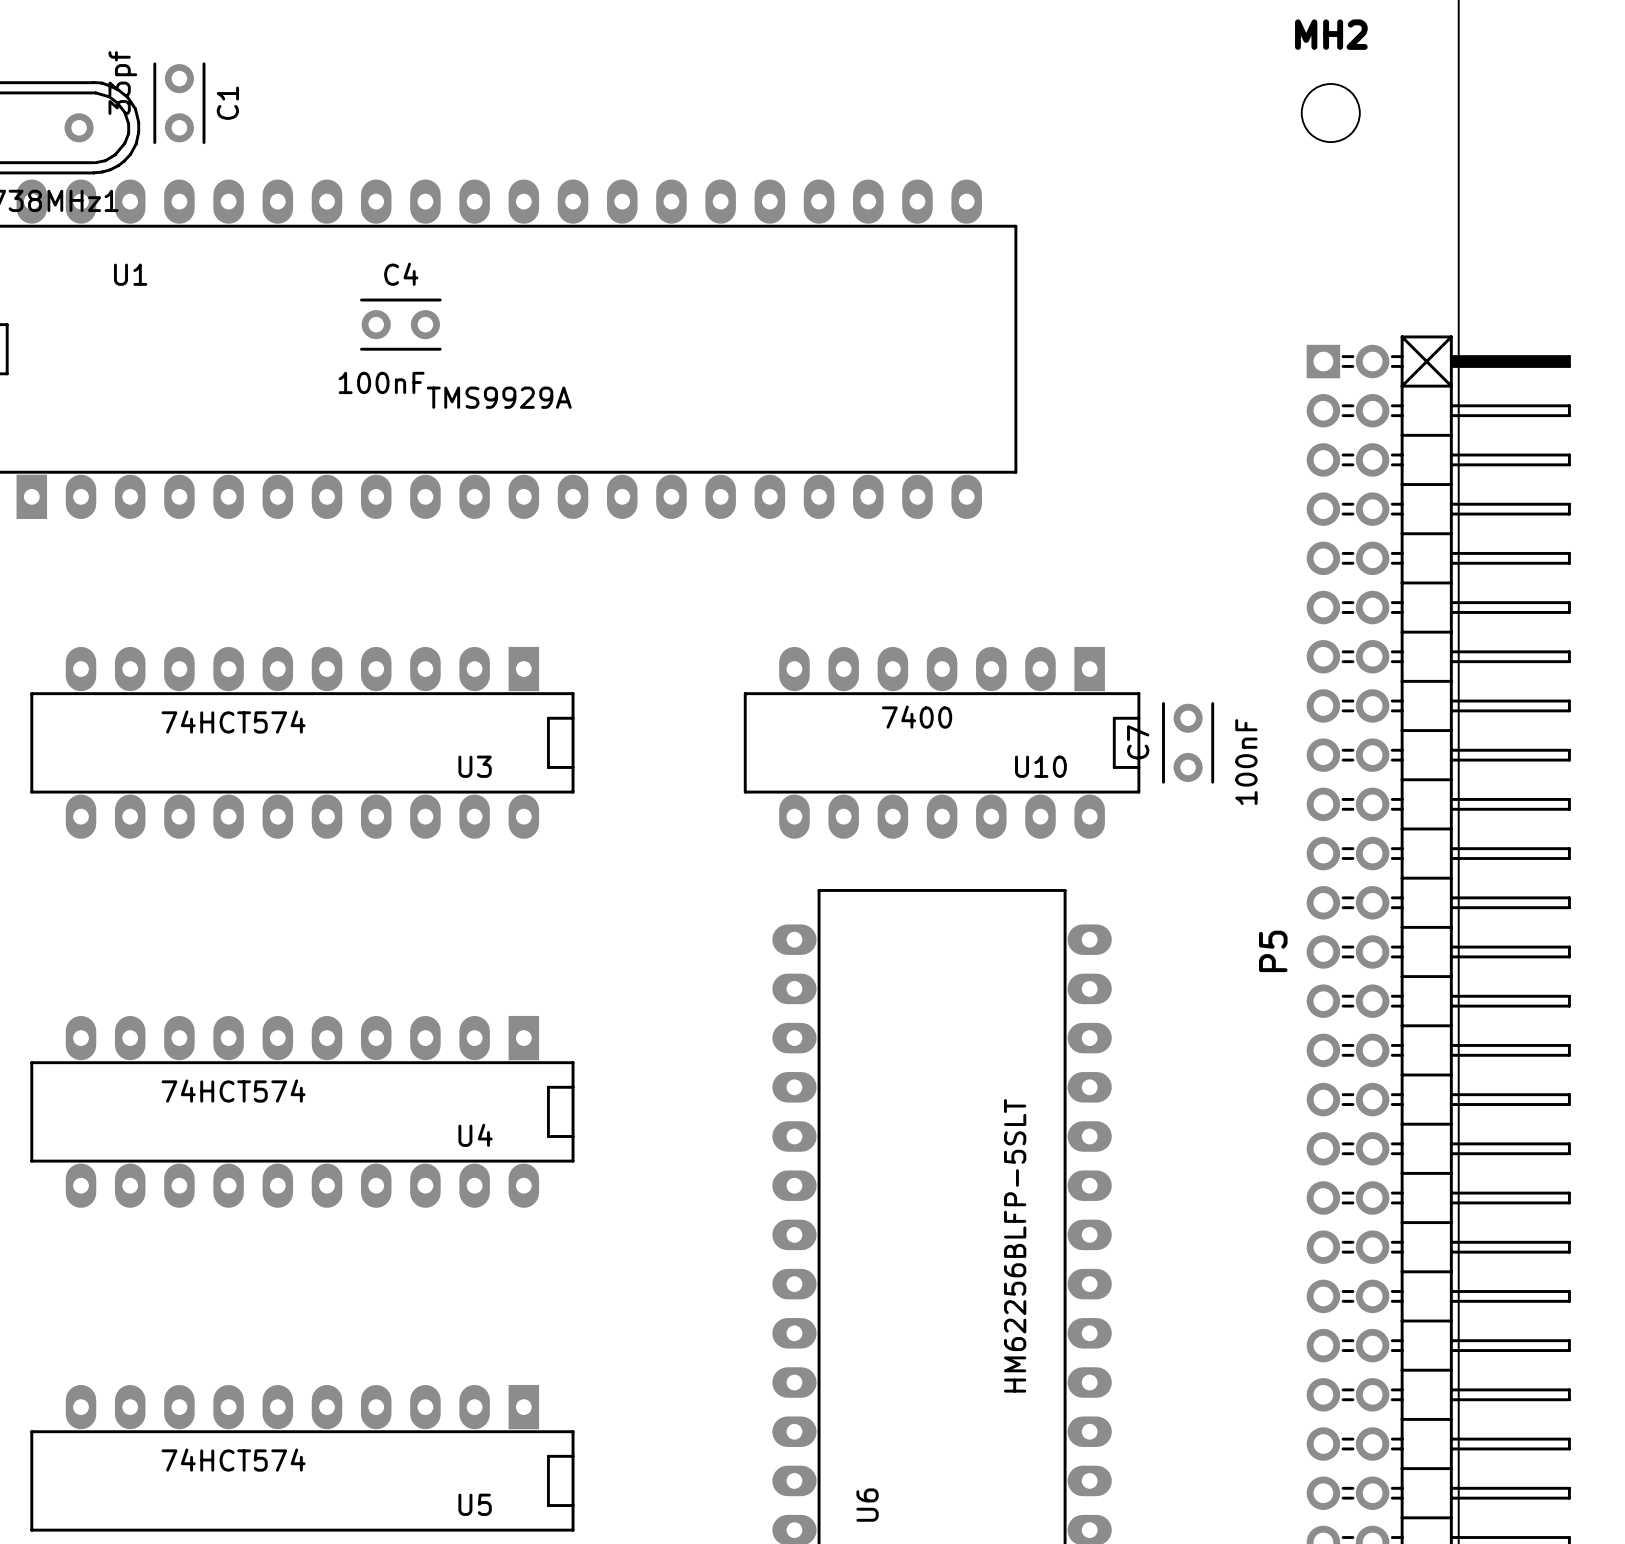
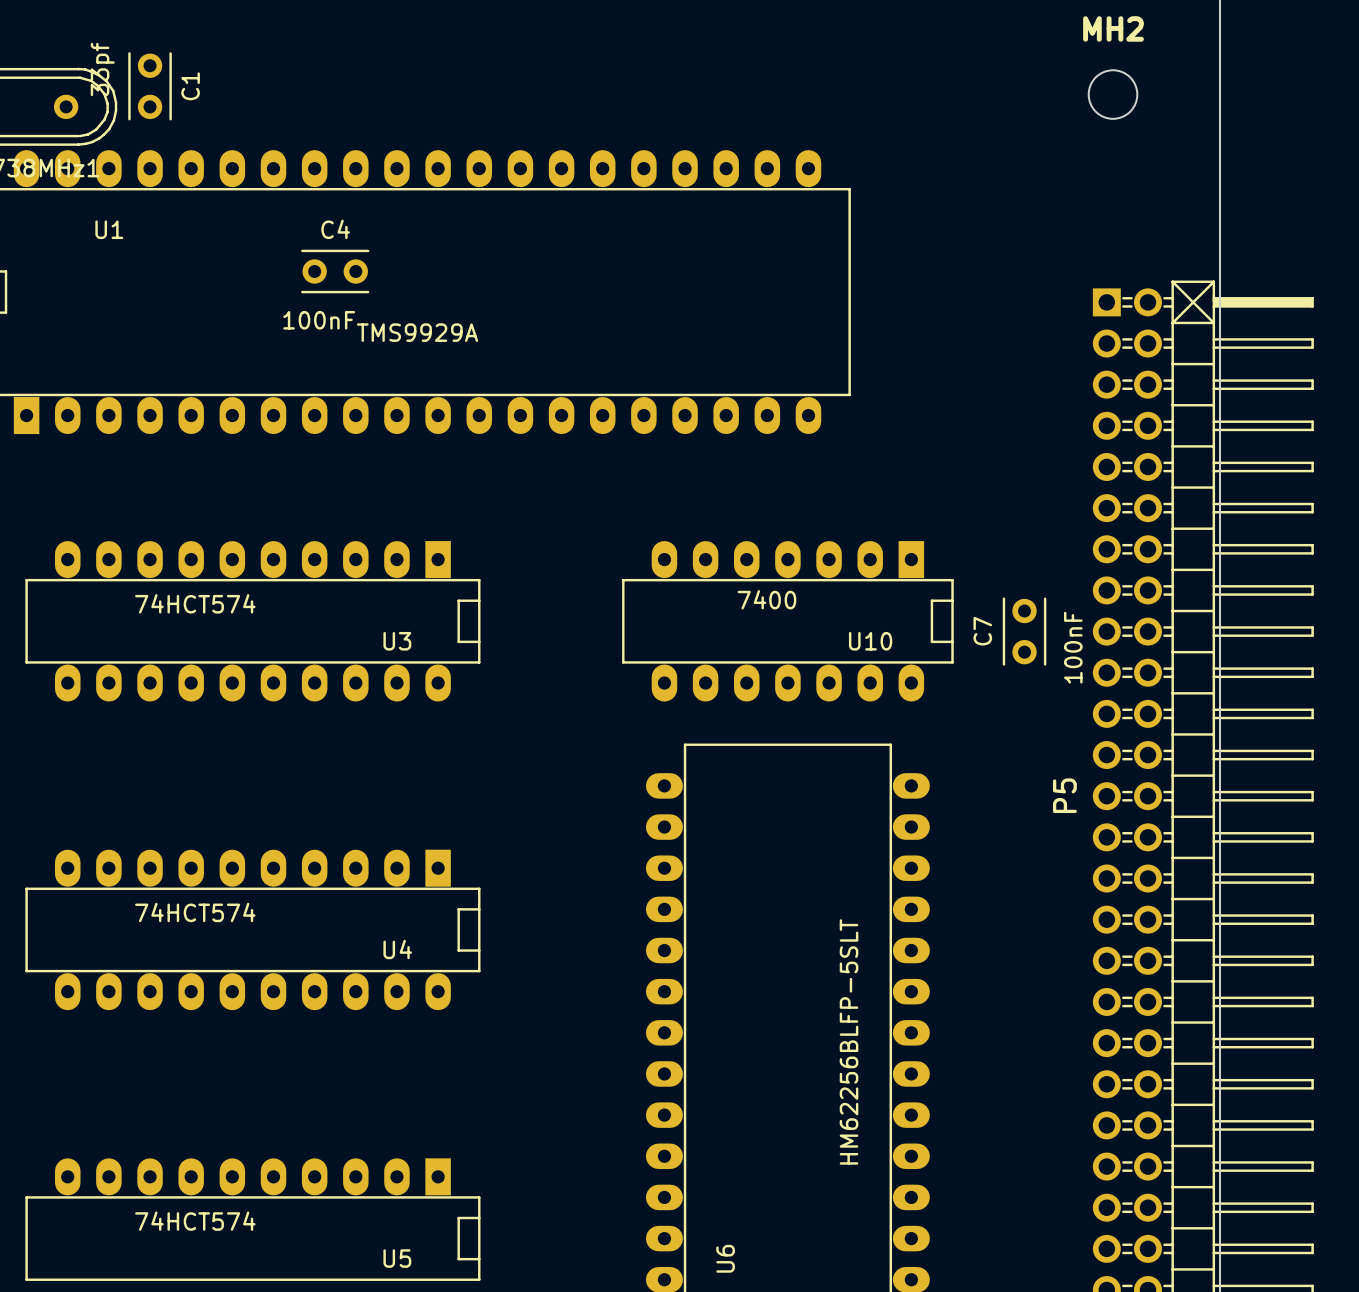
C7 position: (1188, 742) -> (1024, 631)

